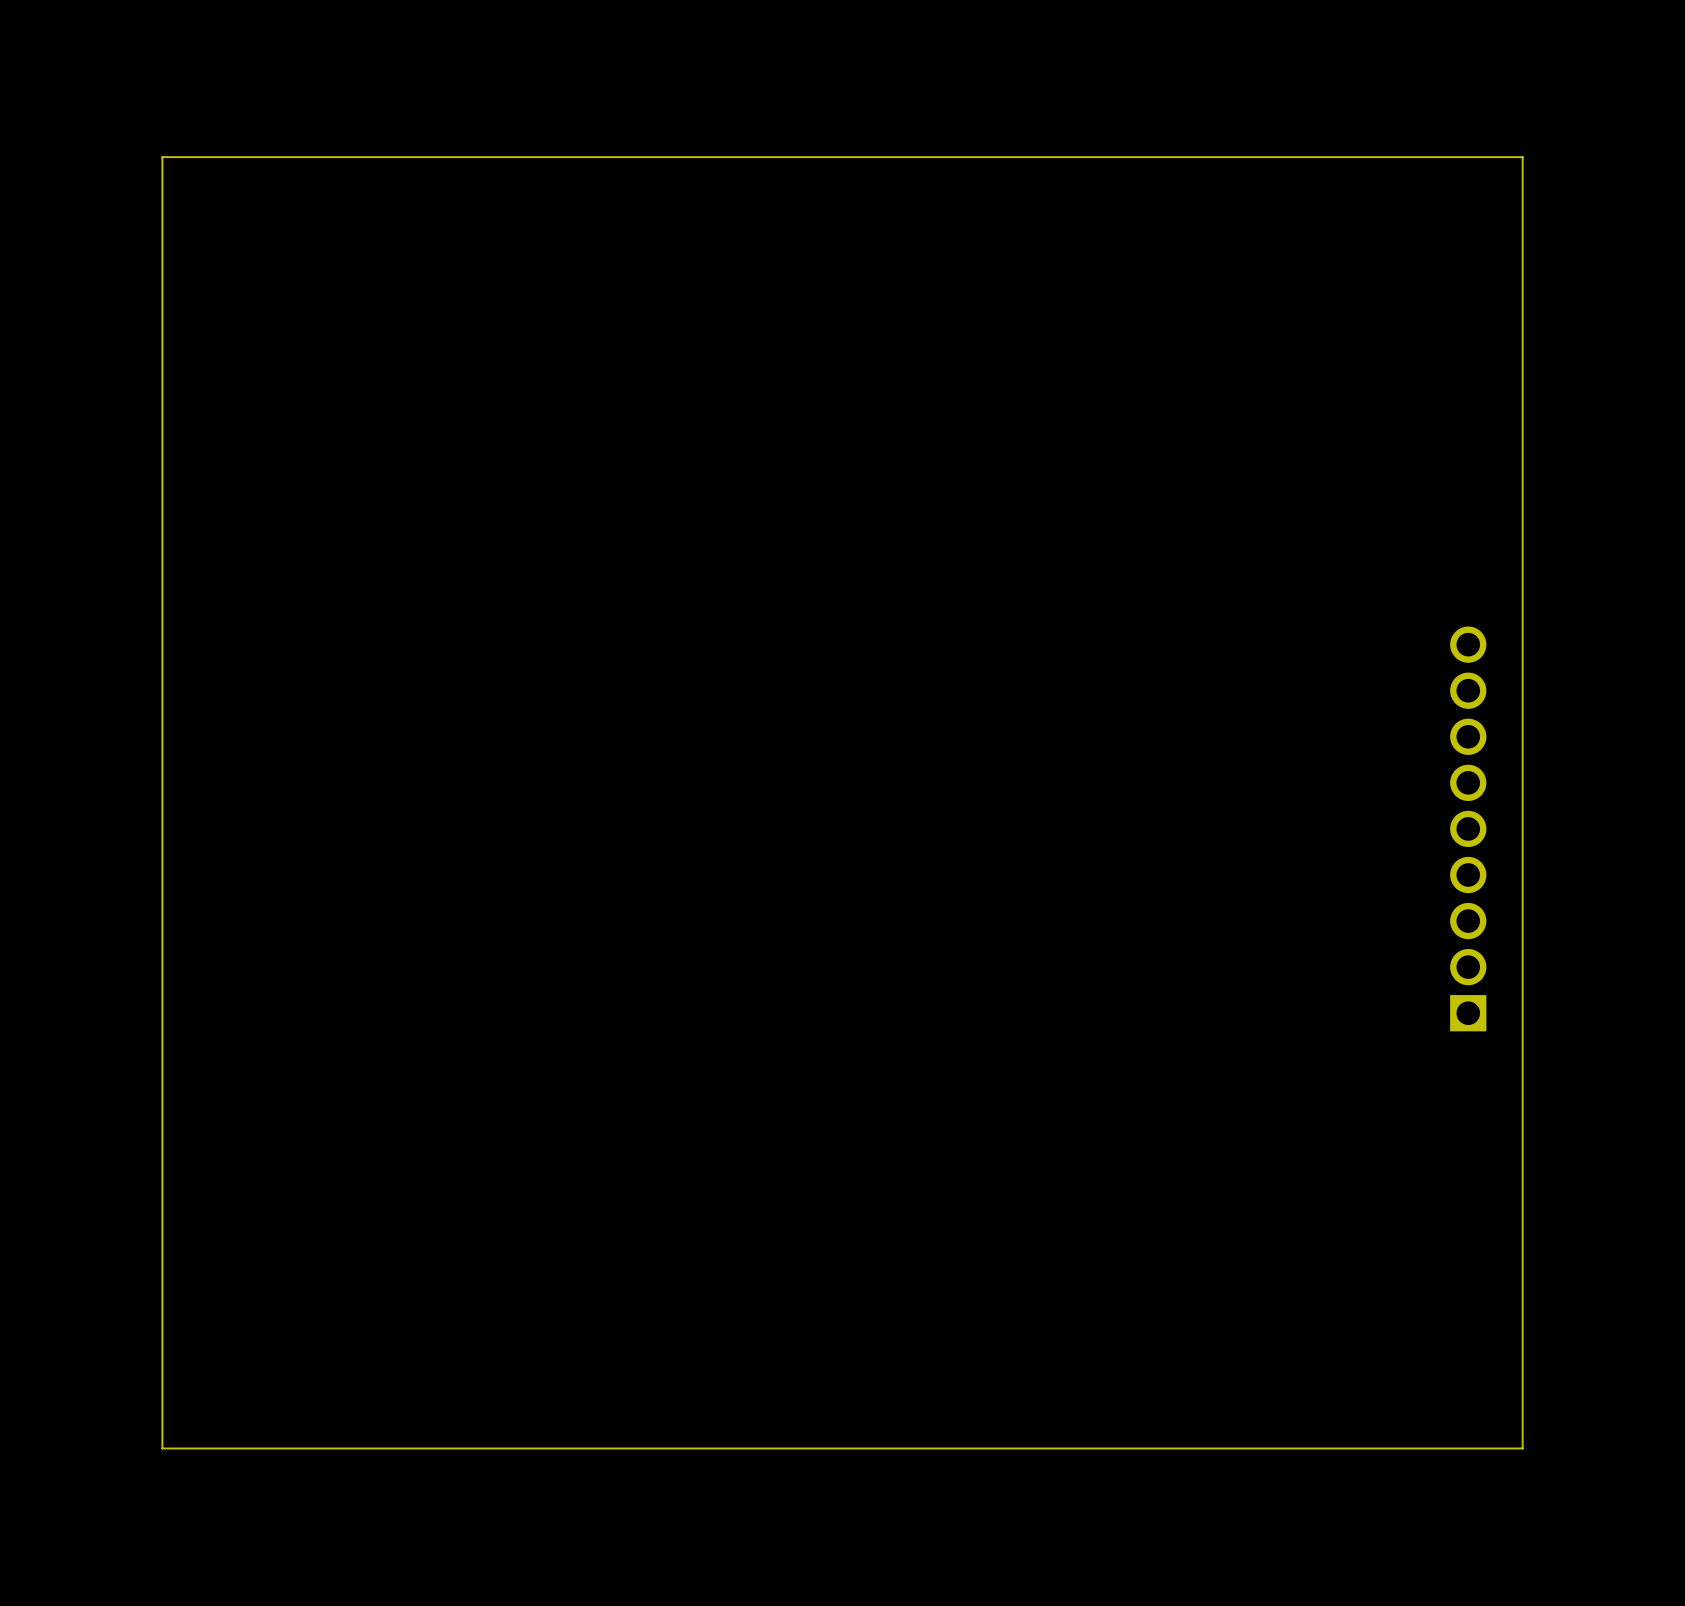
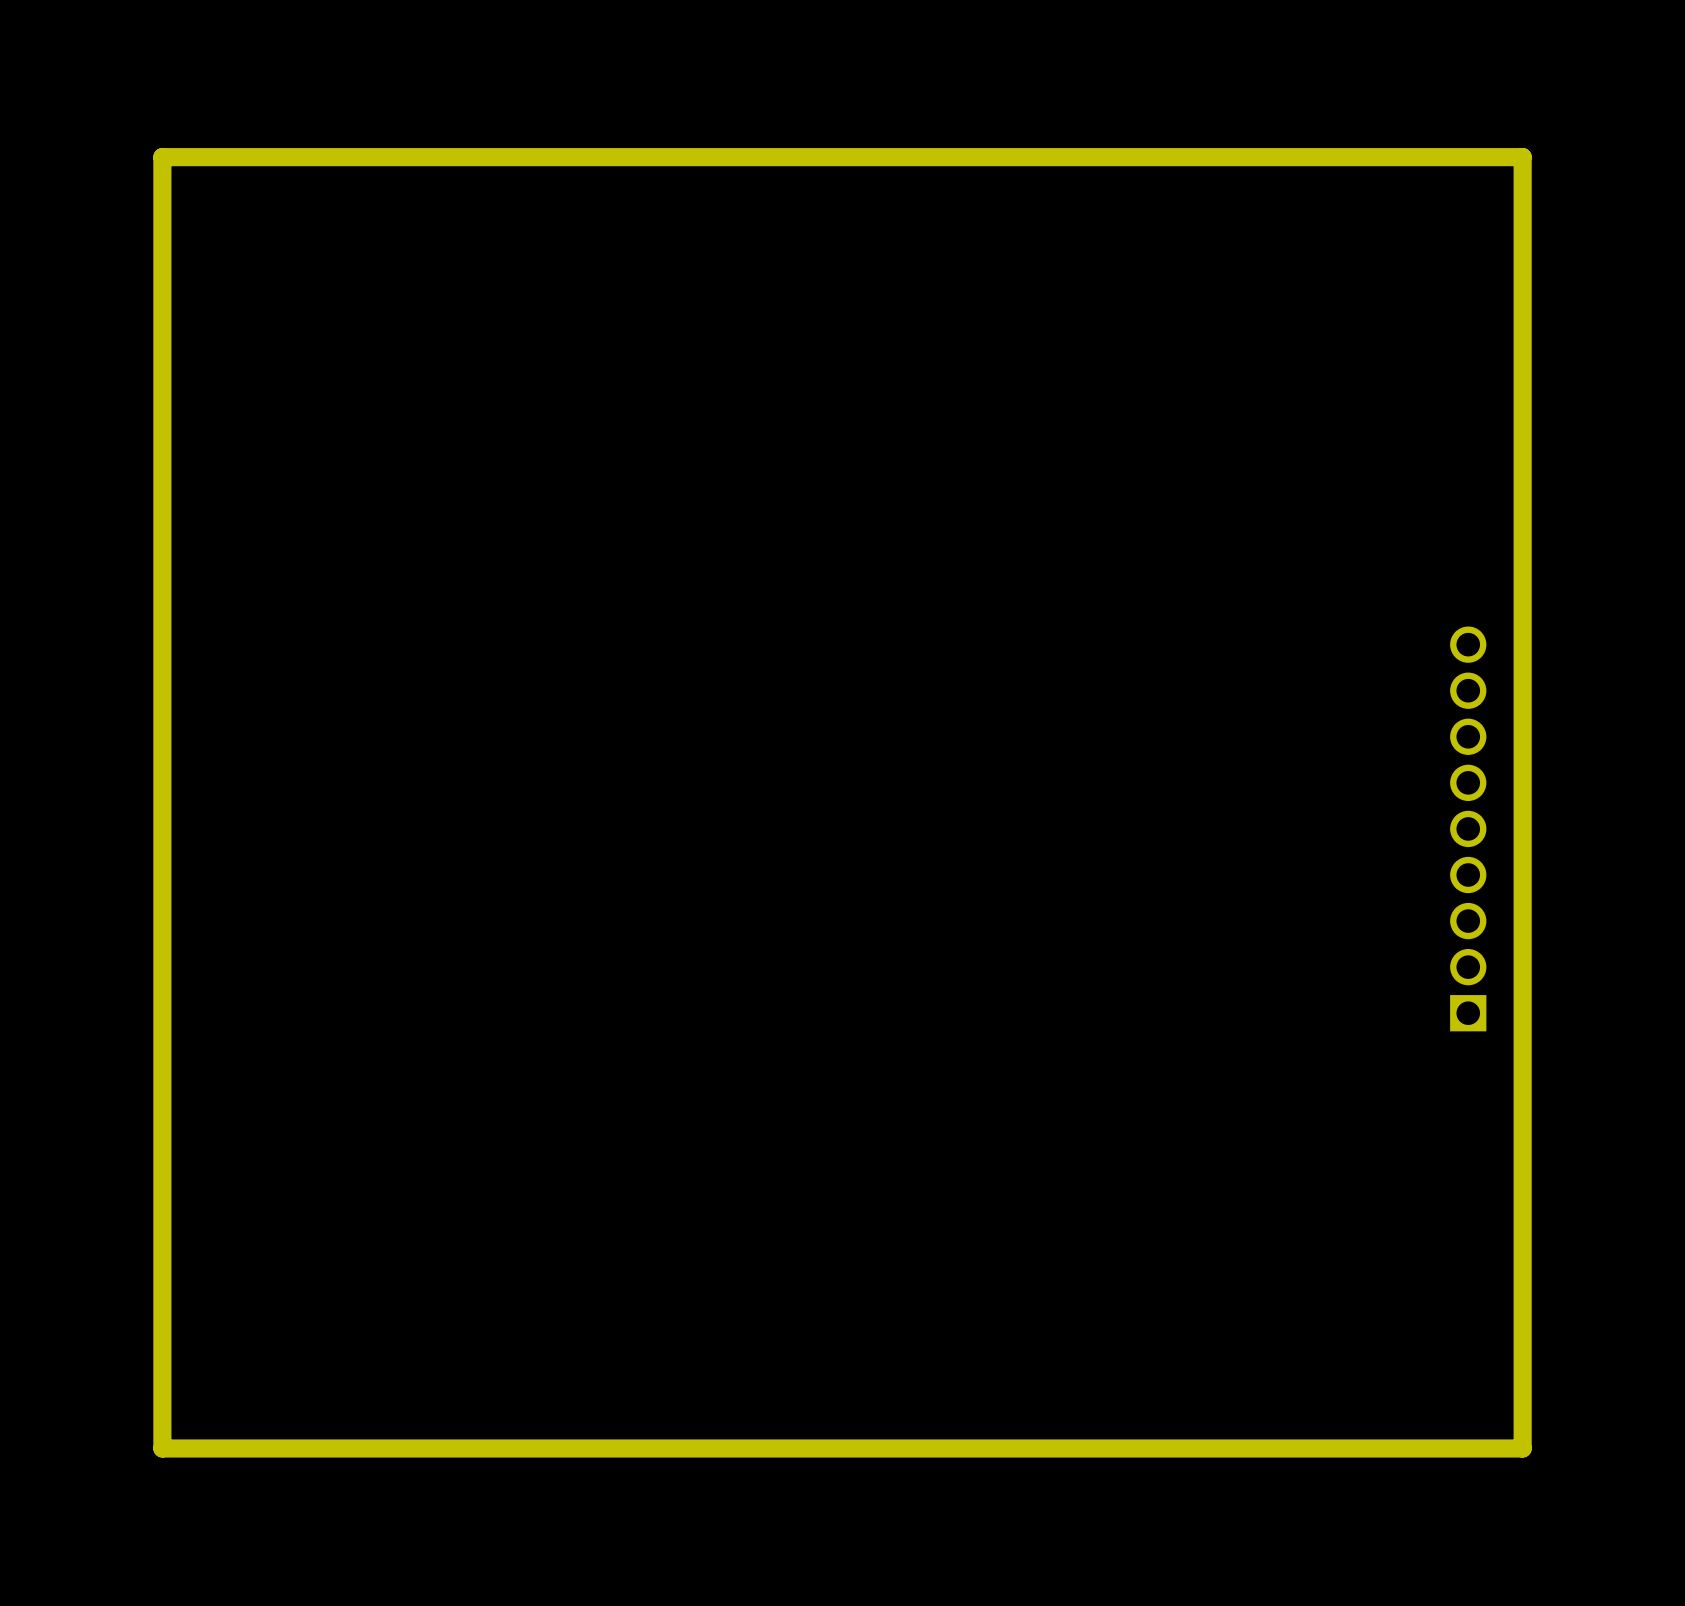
board edge width: thin (1522, 157) (1522, 1448) (162, 1448) (162, 157) (1522, 157) -> thick (1522, 157) (1522, 1448) (162, 1448) (162, 157) (1522, 157)

